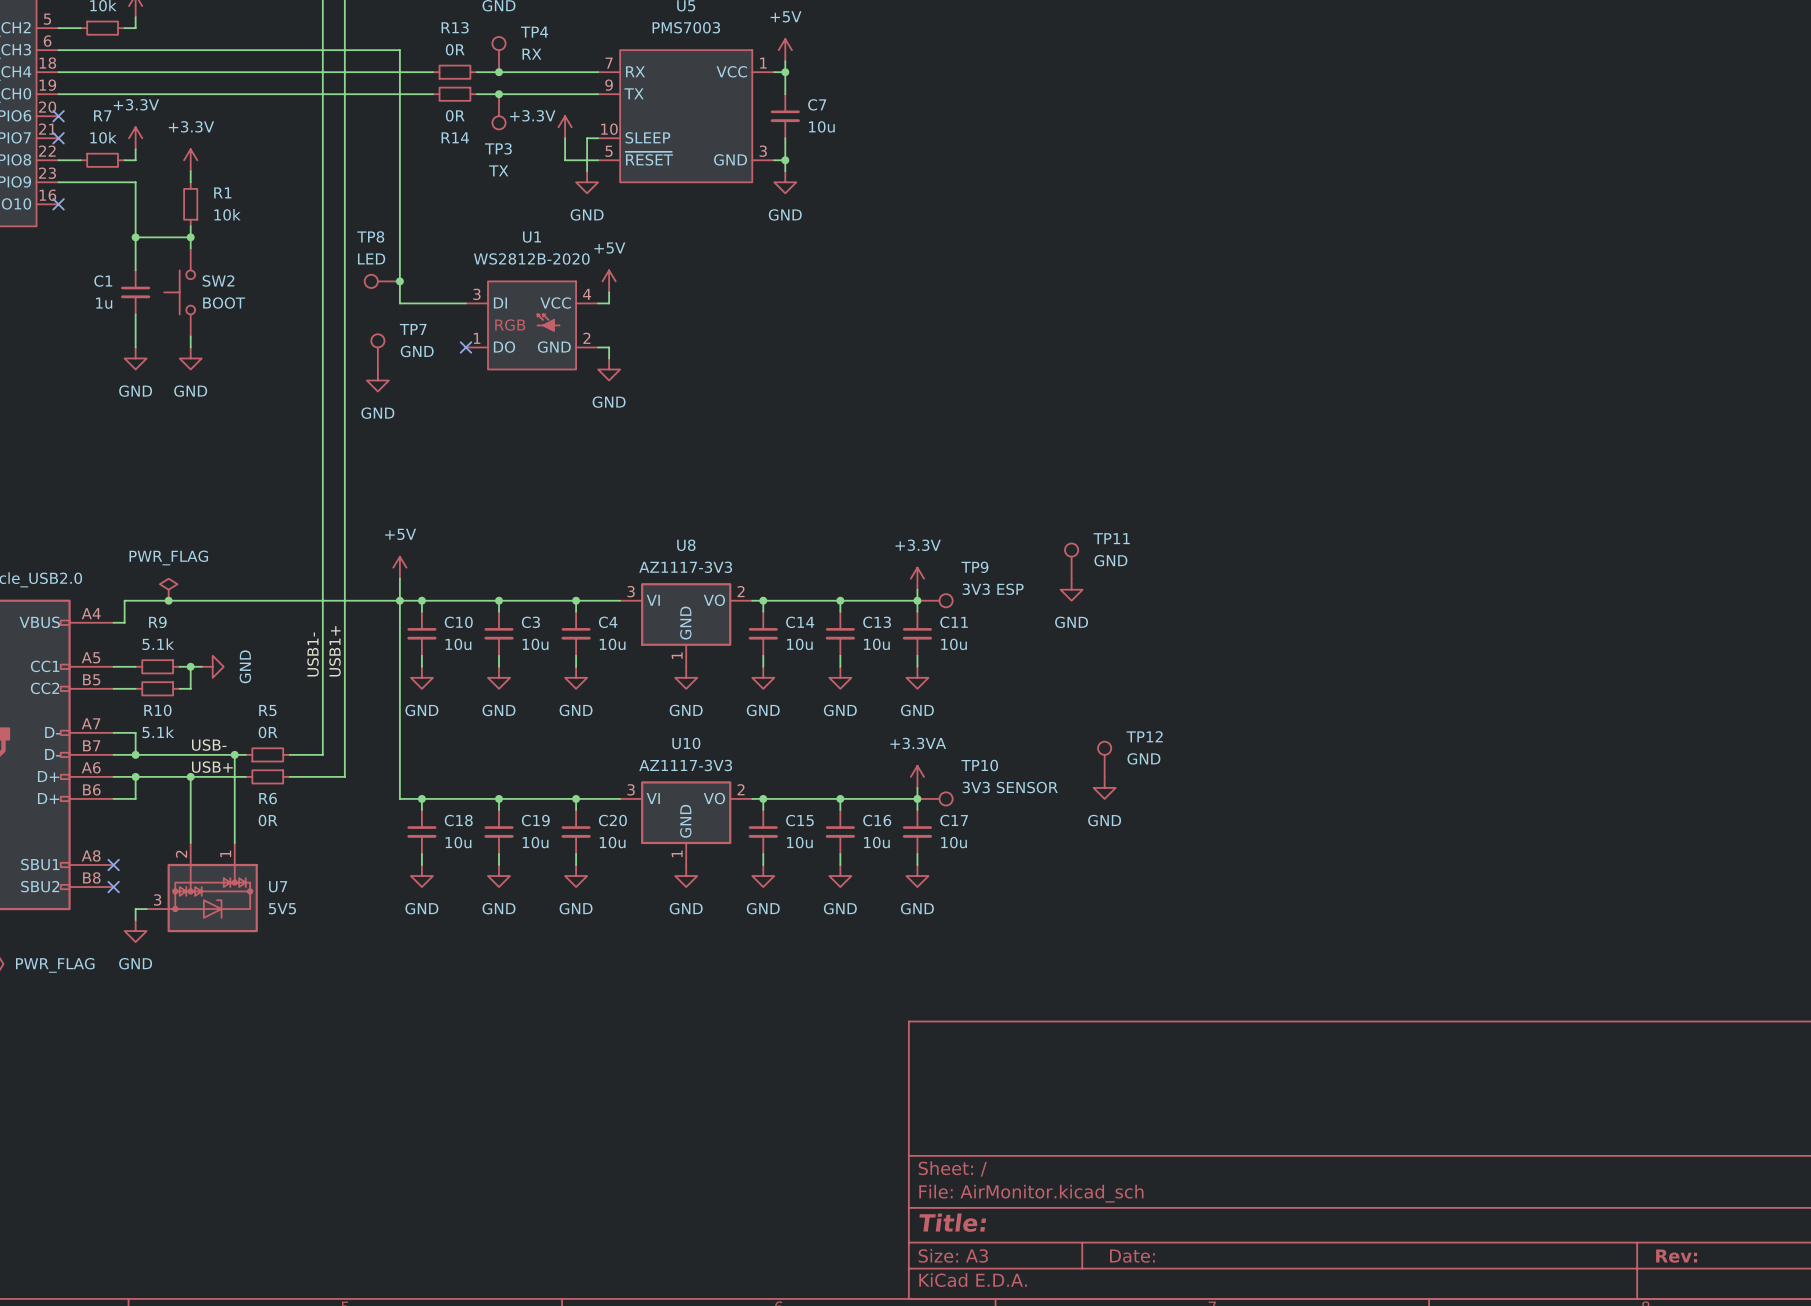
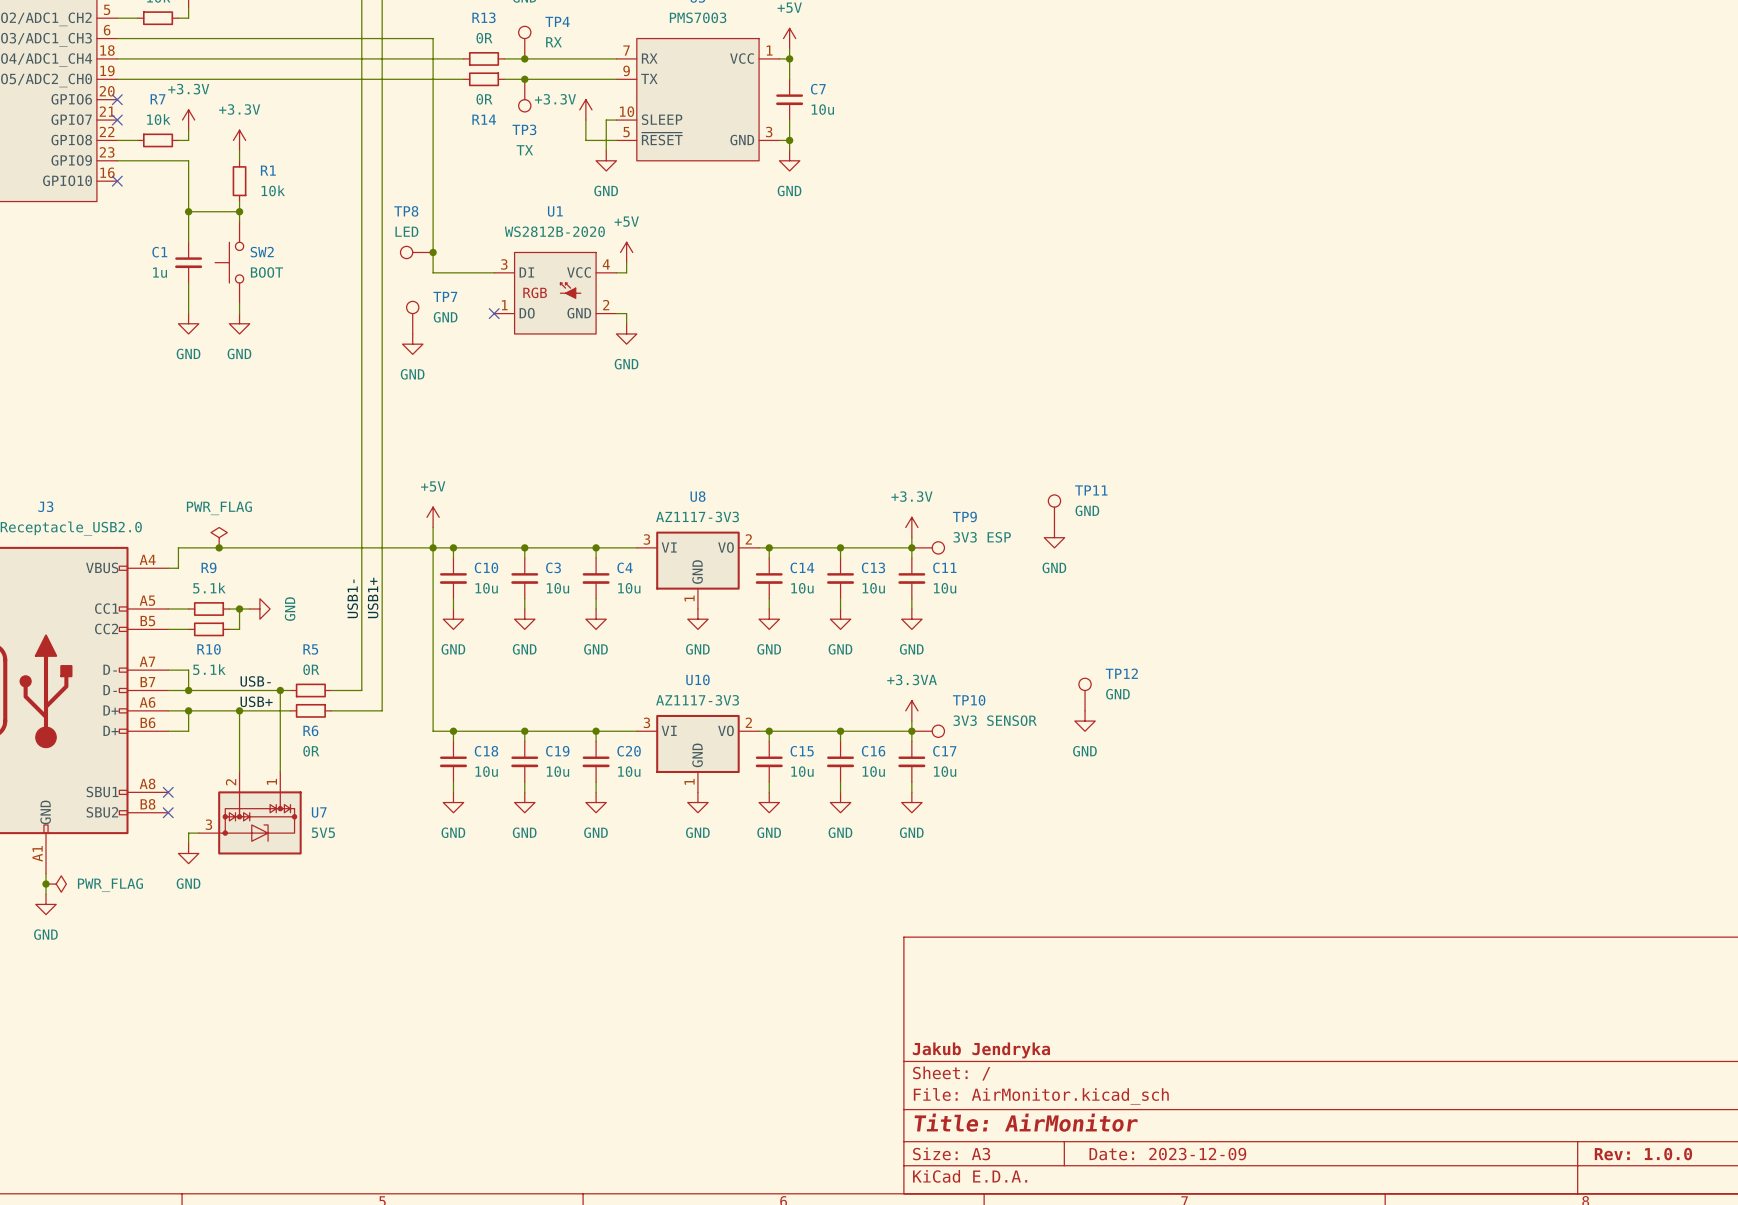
title block: none -> Jakub Jendryka (981, 1050)
title block: Title: (952, 1222) -> Title: AirMonitor (1026, 1122)
title block: Date: (1132, 1256) -> Date: 2023-12-09 (1167, 1154)
title block: Rev: (1676, 1256) -> Rev: 1.0.0 (1643, 1154)

